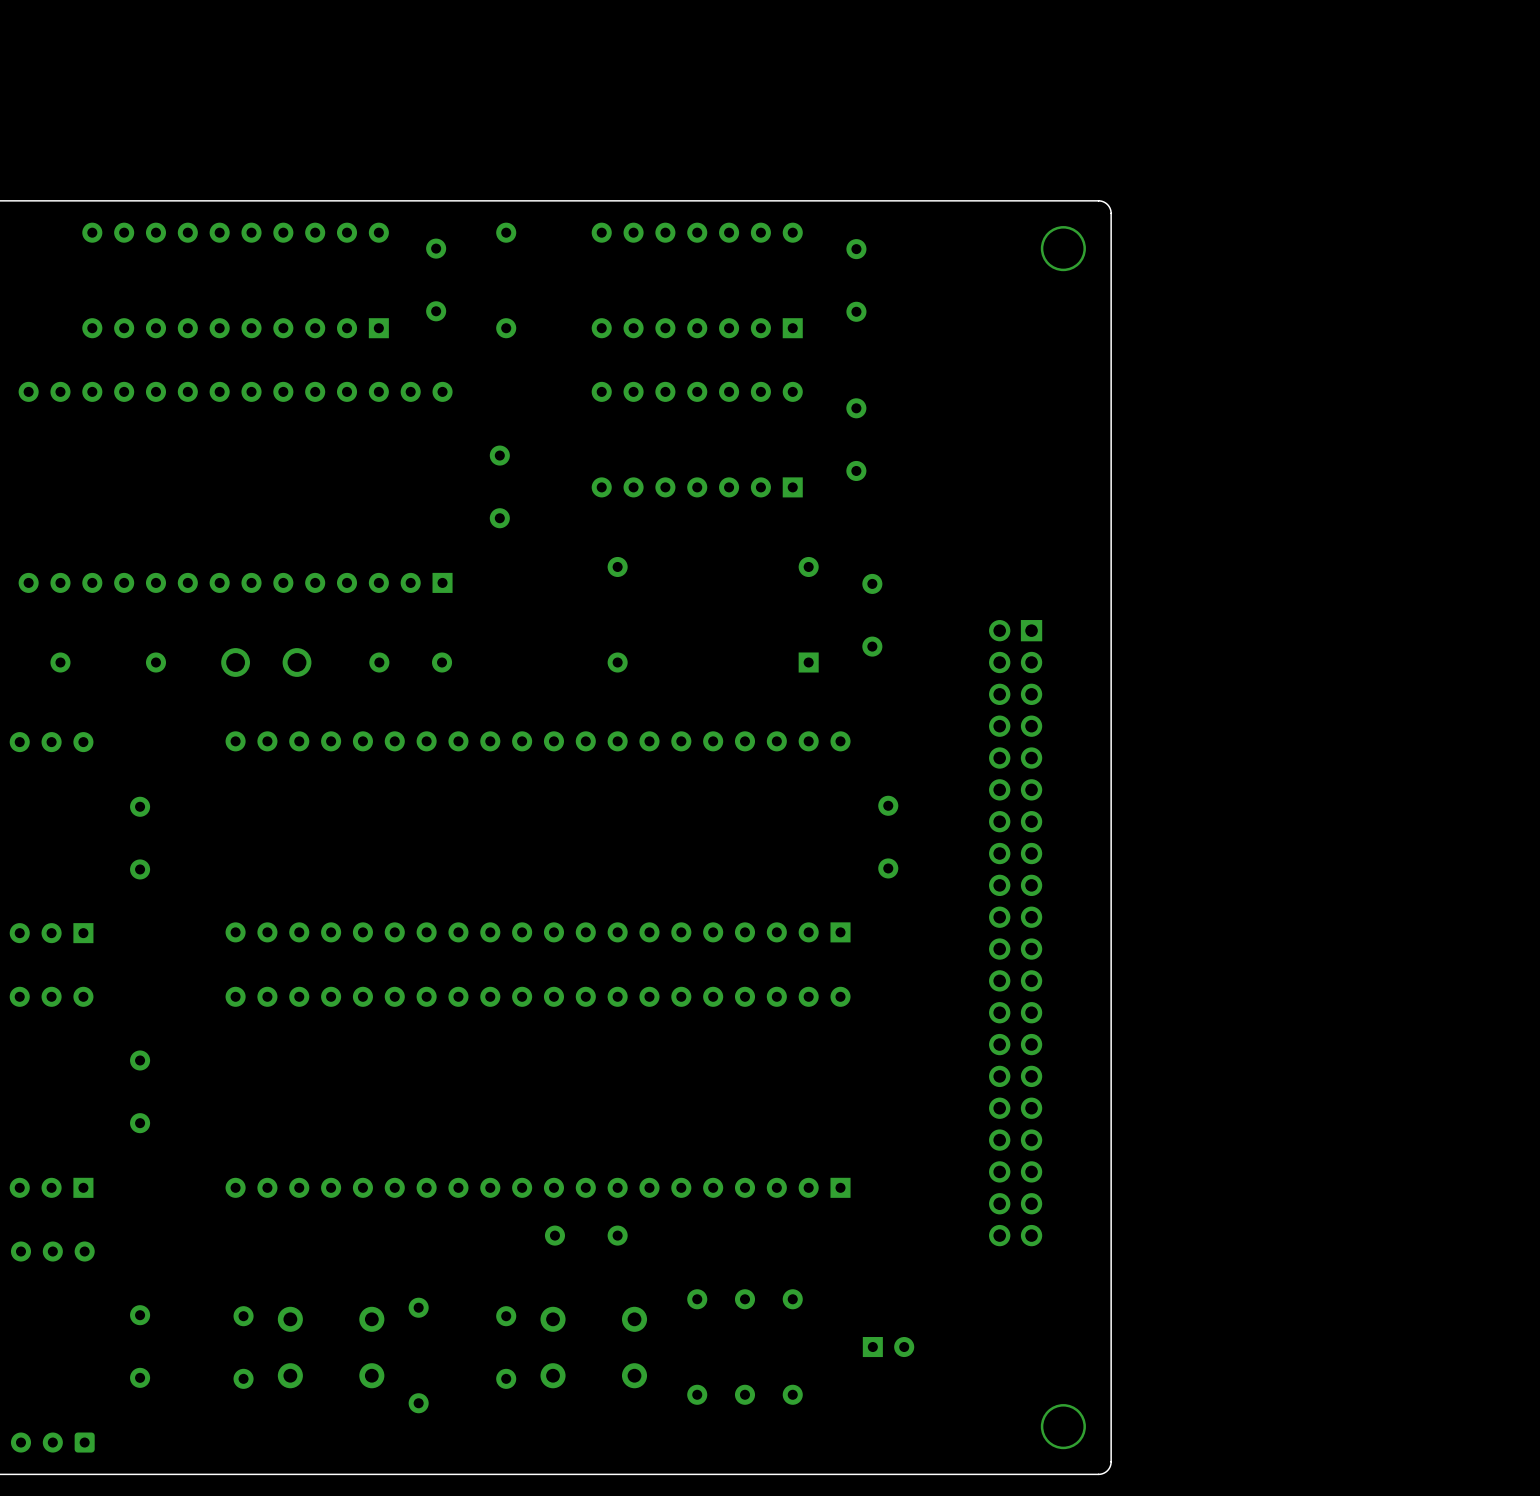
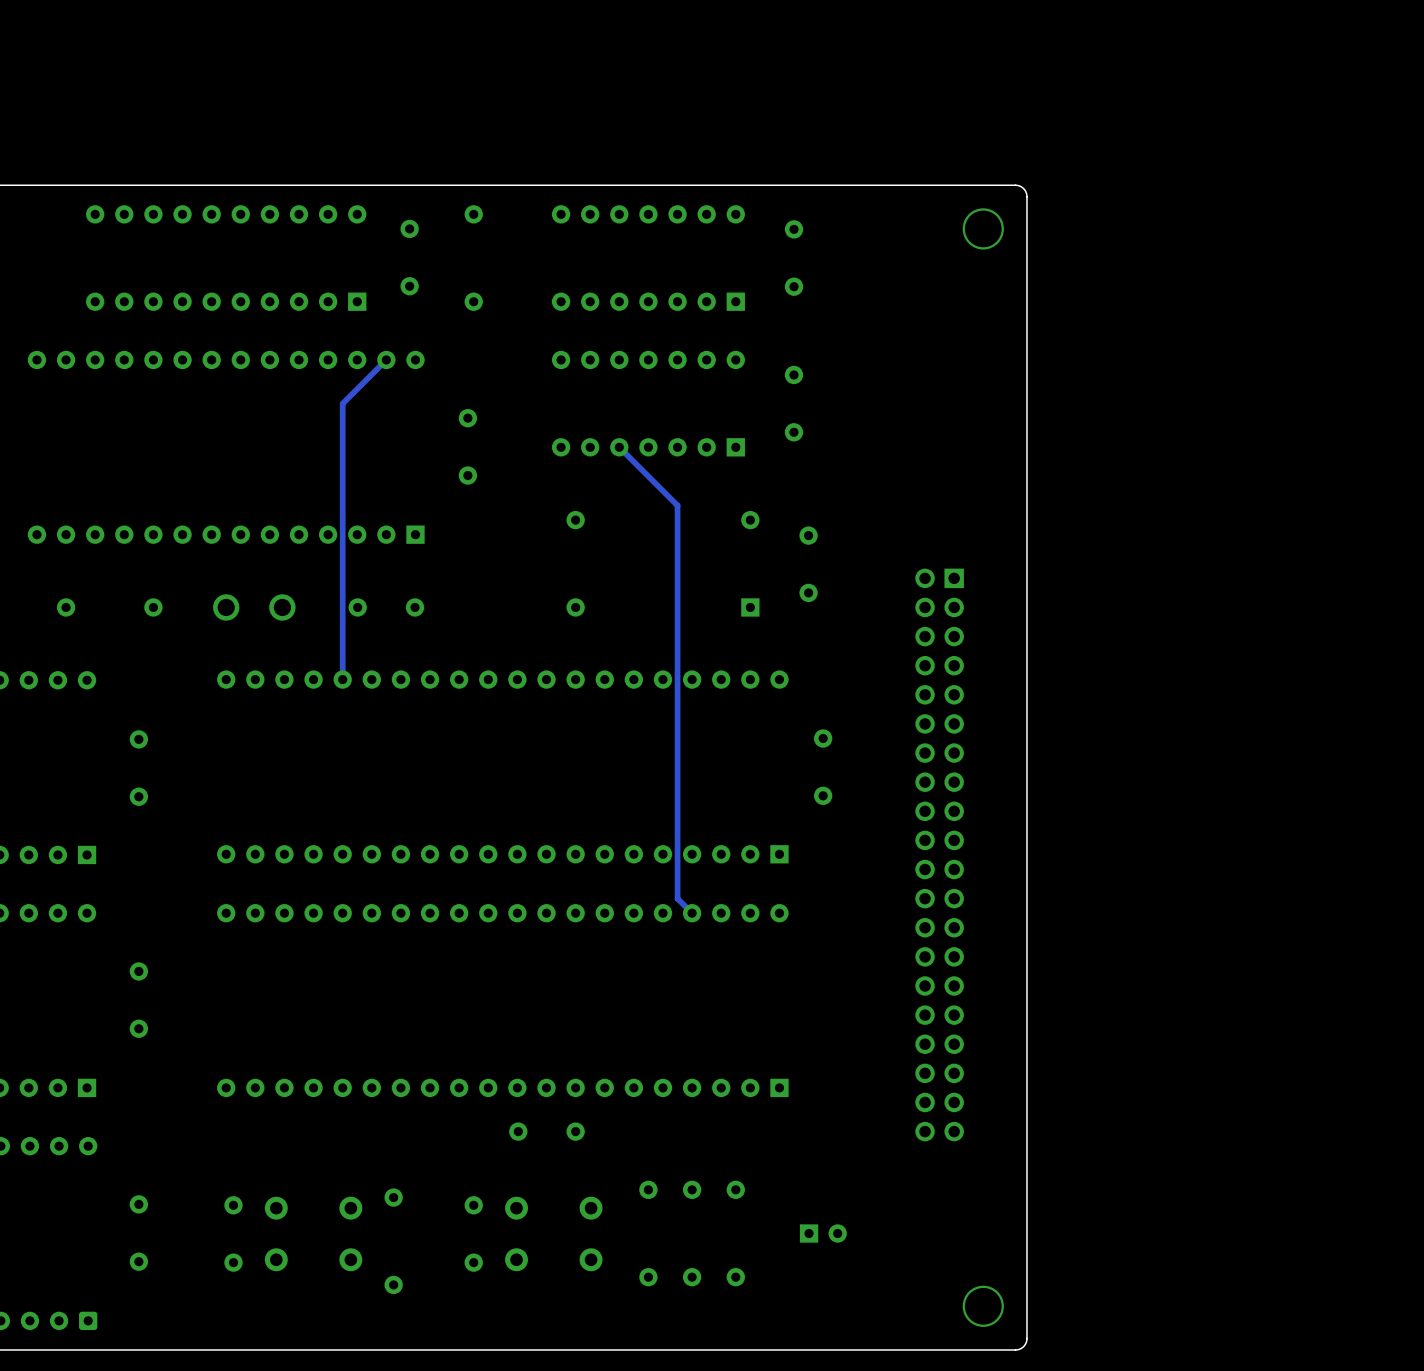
track: none -> (386, 359) (342, 403) (342, 679)
track: none -> (619, 447) (677, 505) (677, 898) (692, 913)

